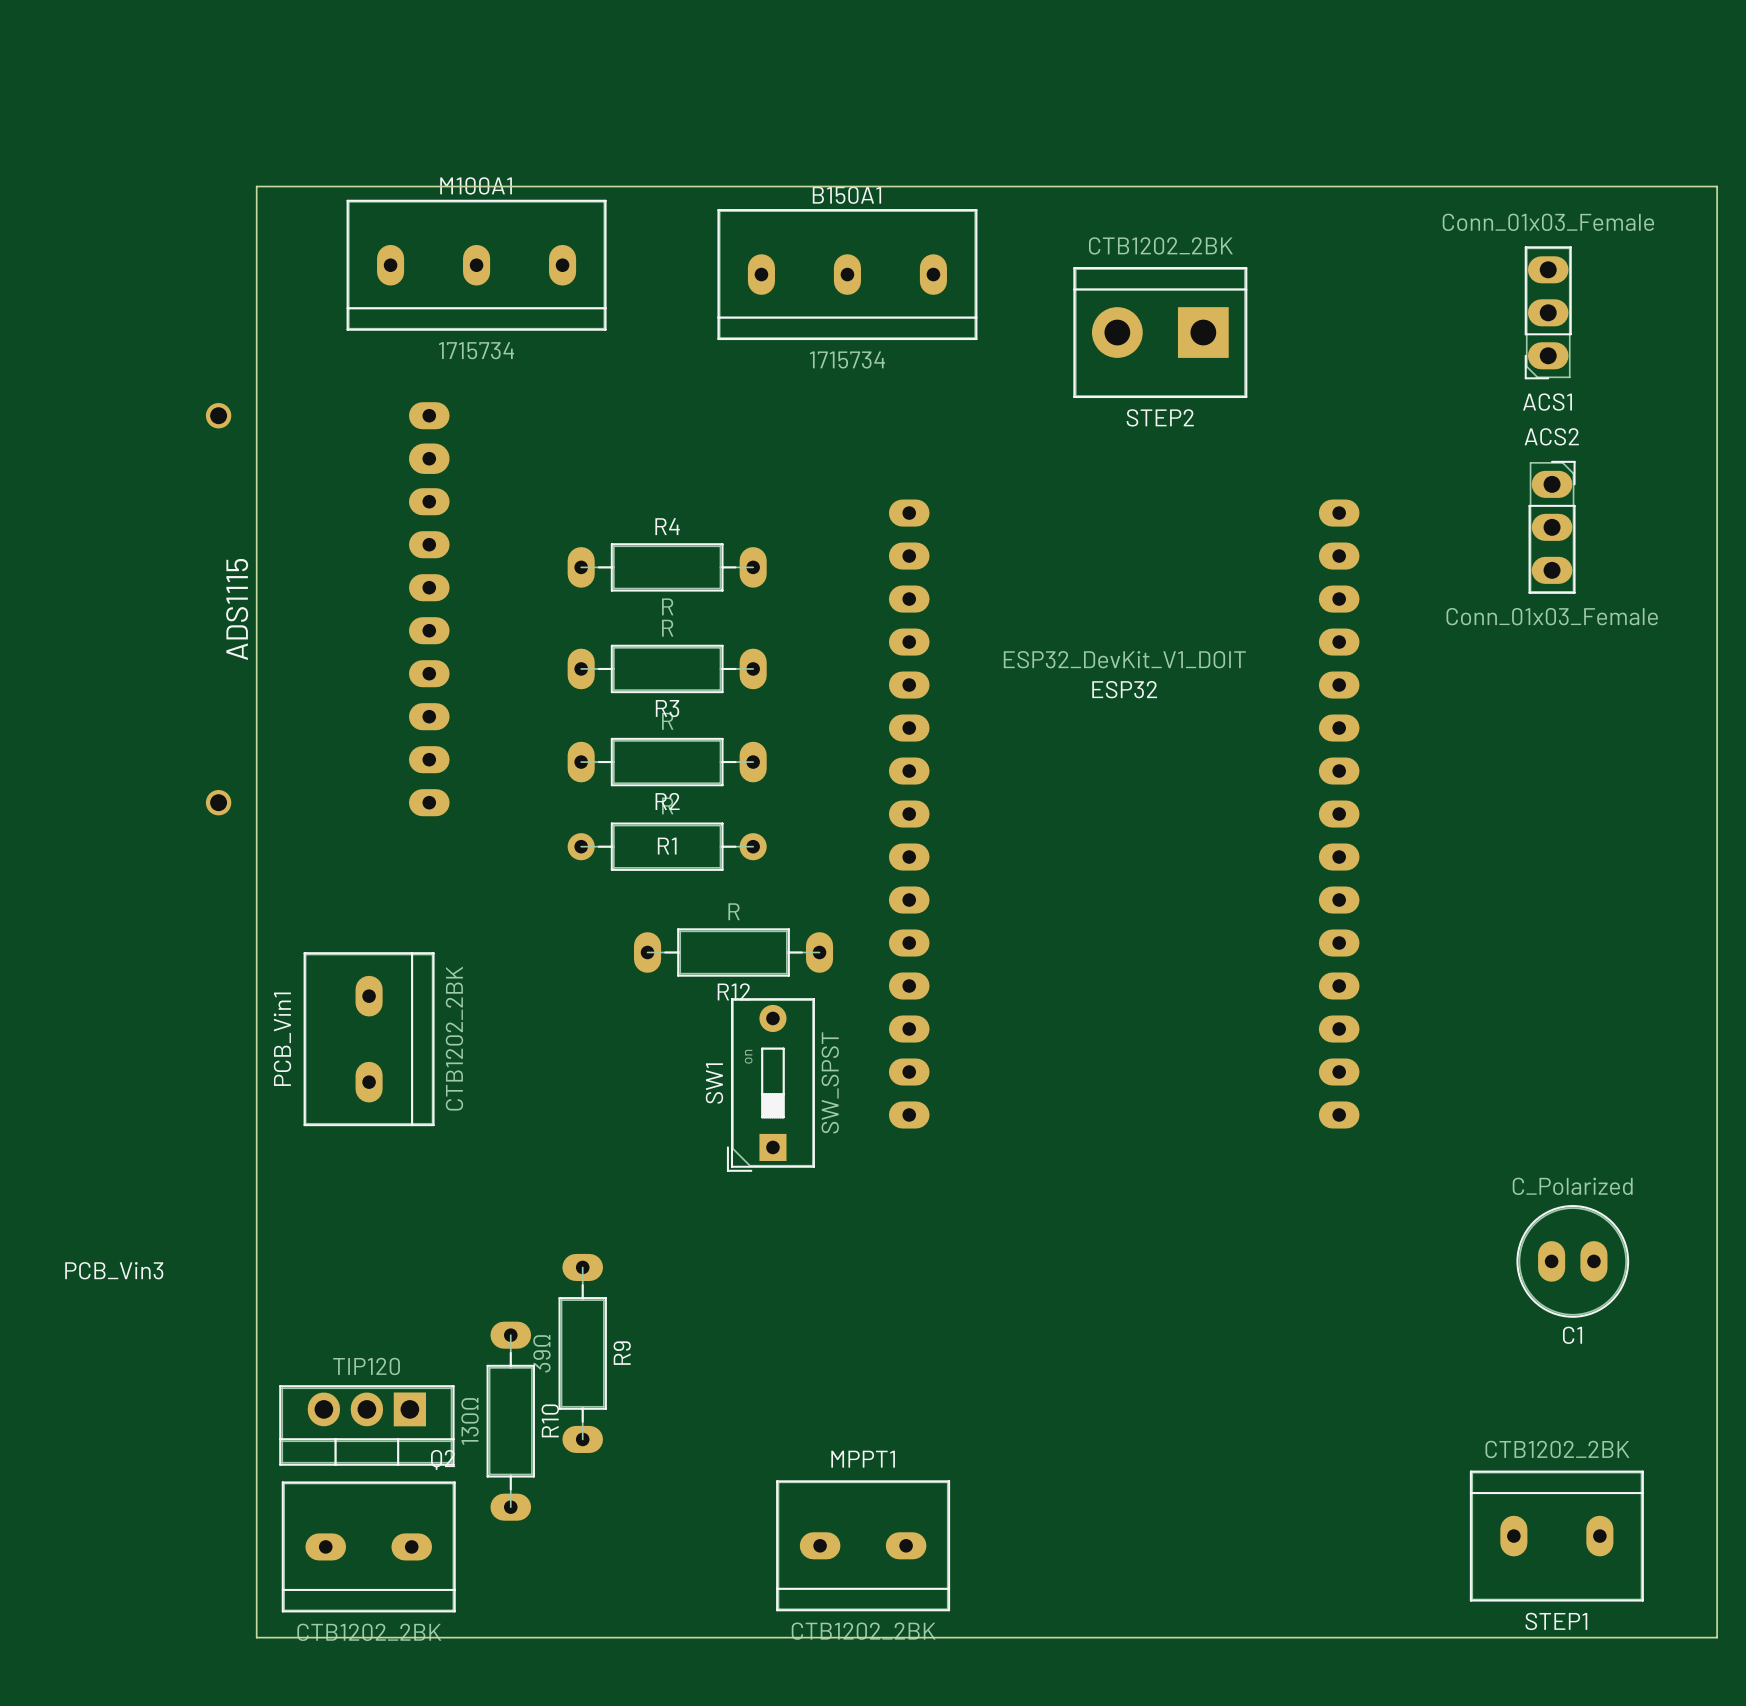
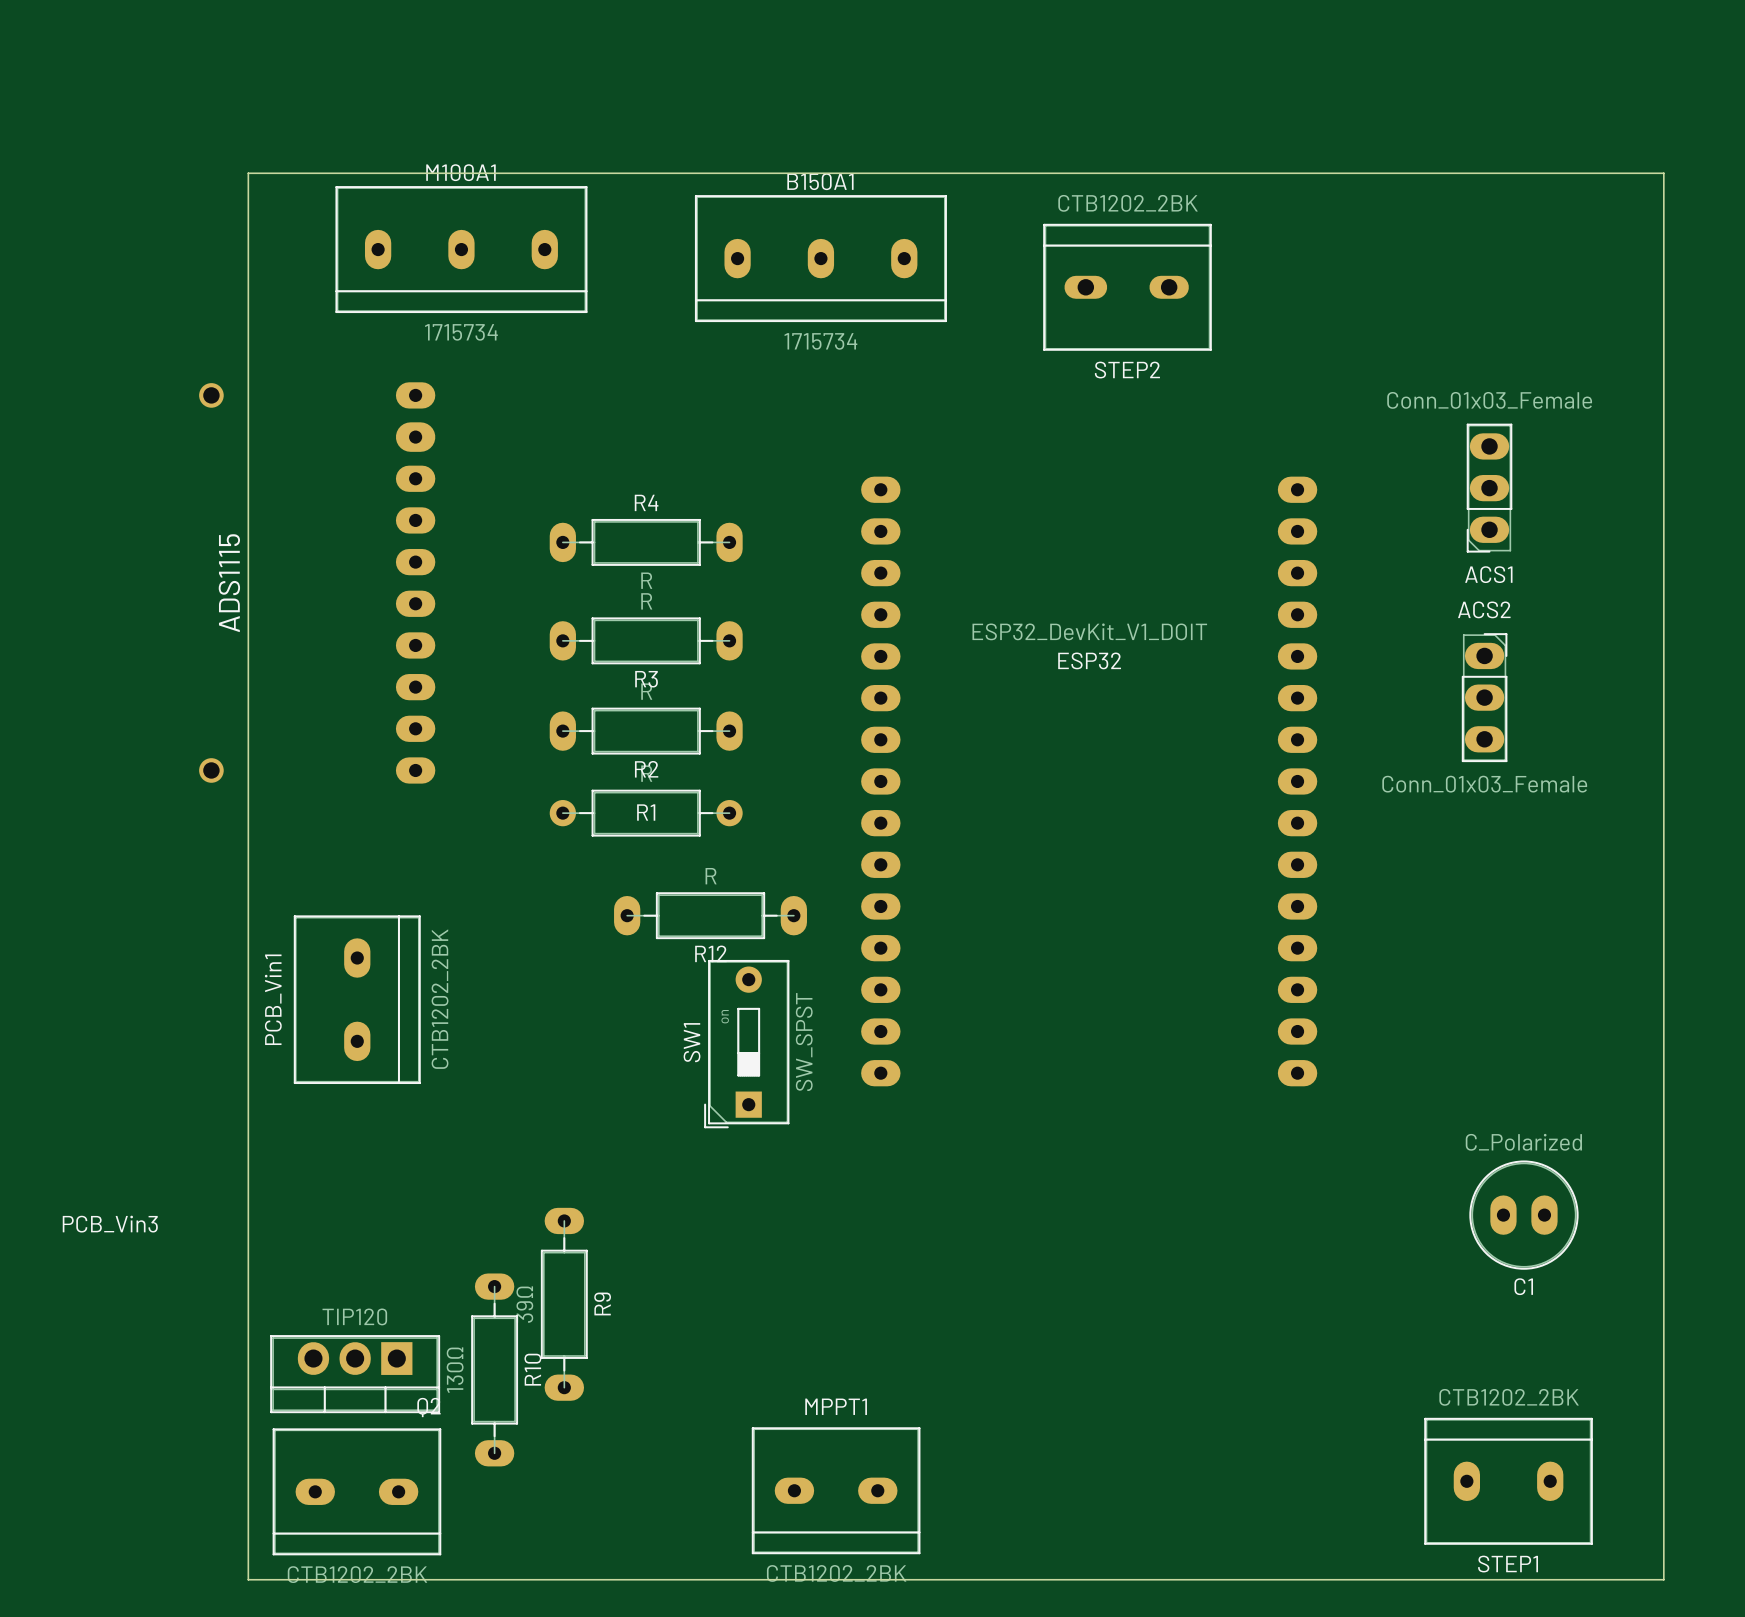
STEP2 footprint: [1073, 267, 1248, 399] -> [1043, 223, 1212, 351]
ACS1 position: (1548, 312) -> (1489, 488)
ACS2 position: (1552, 527) -> (1484, 697)

